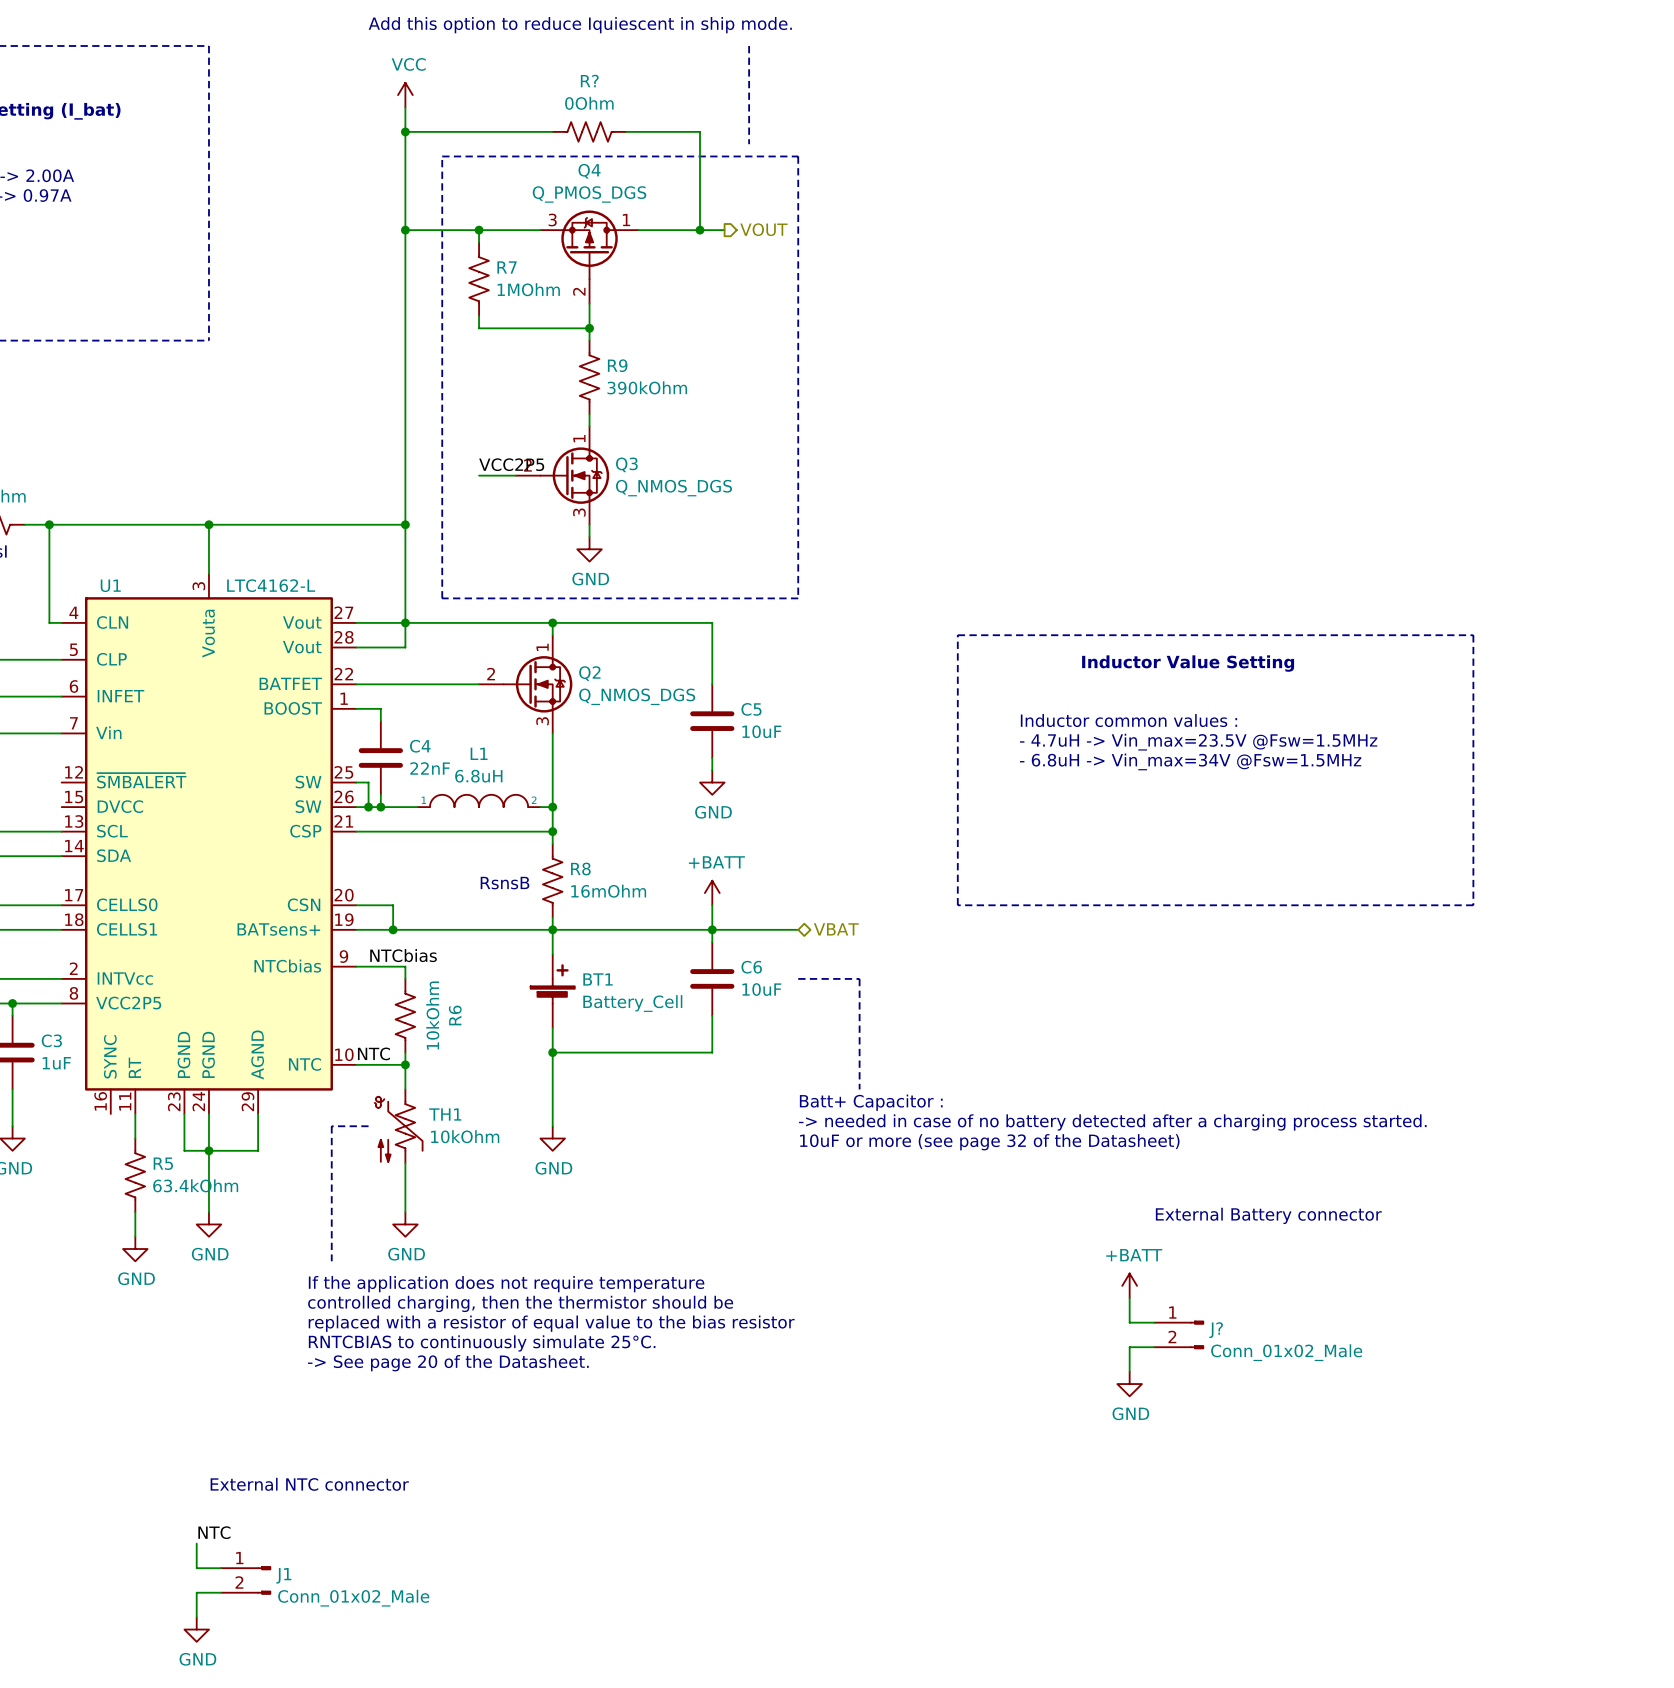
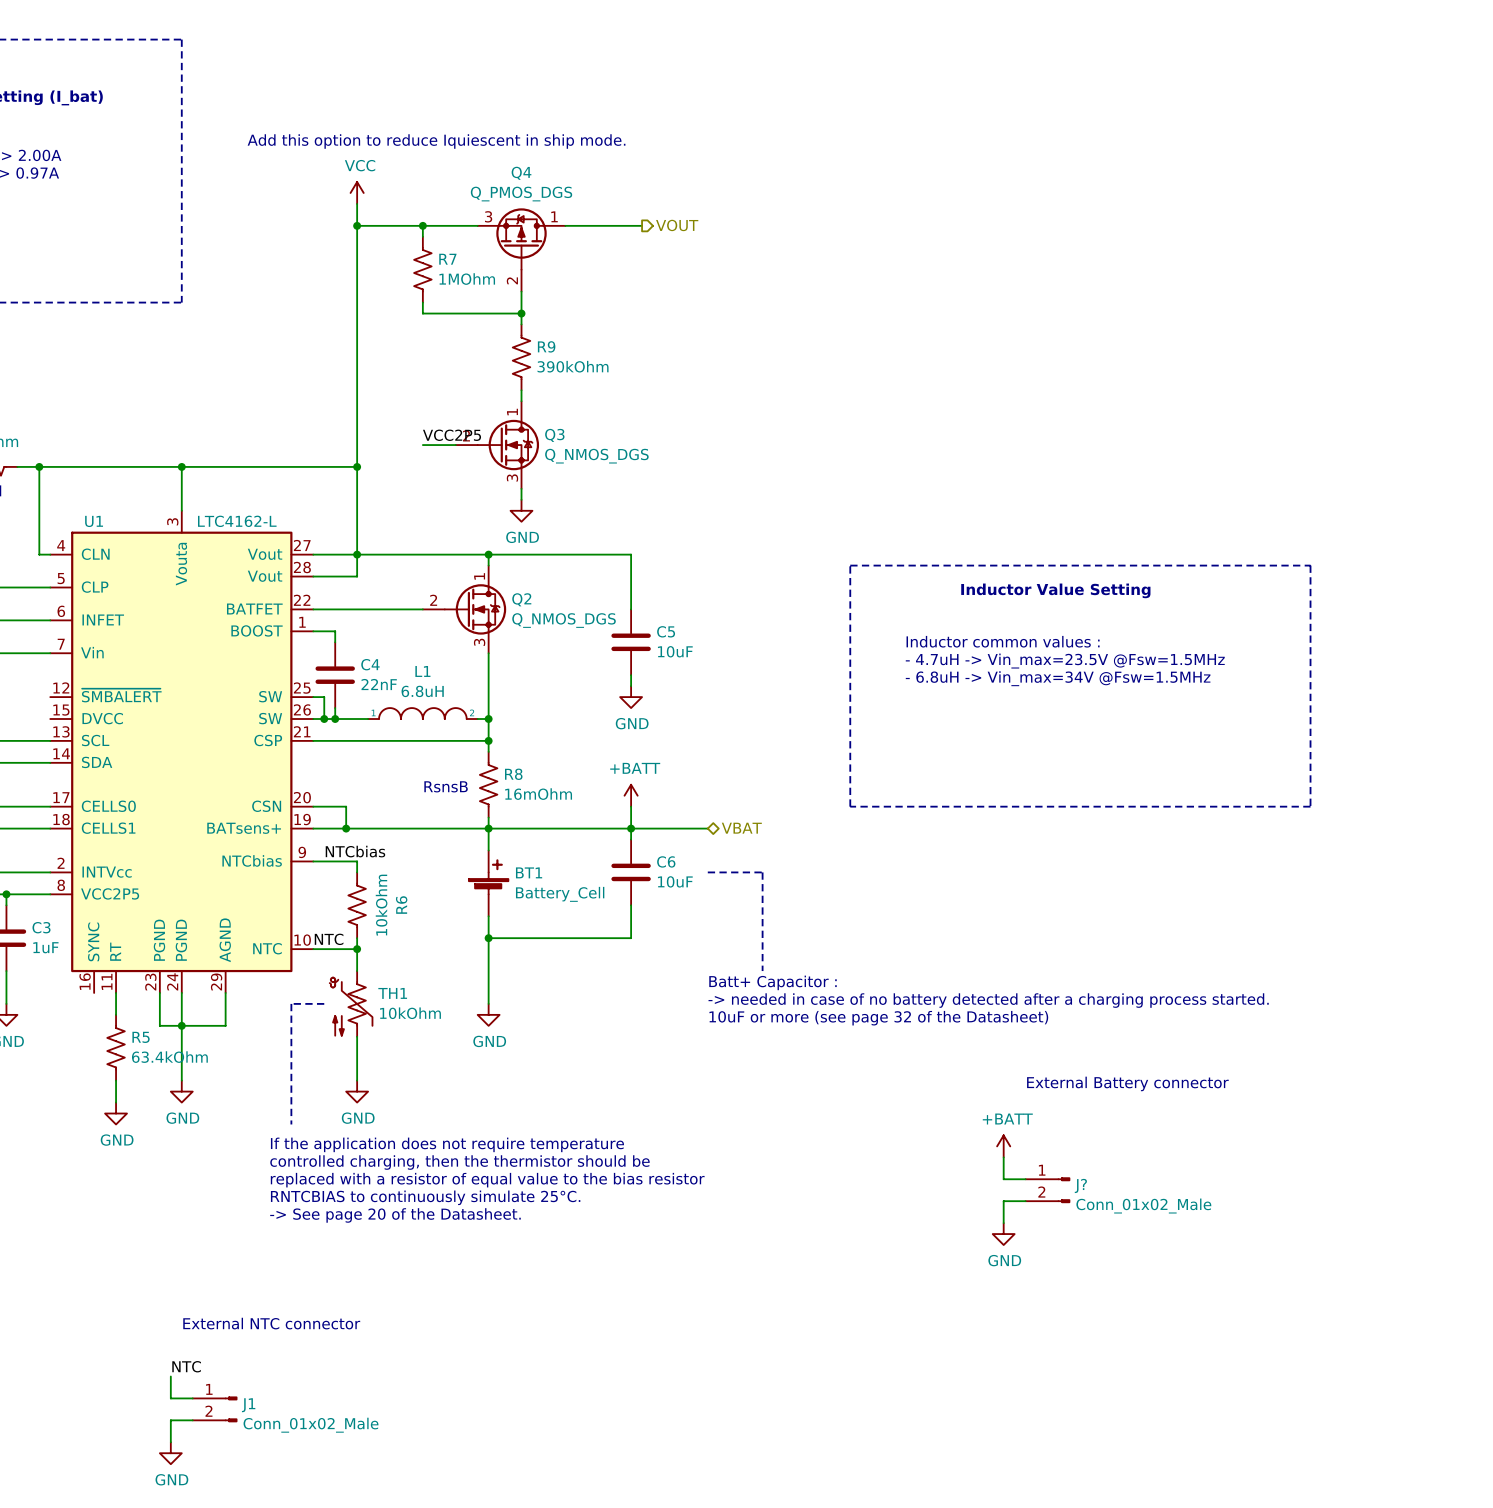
text position: Add this option to reduce Iquiescent in ship mode. (580, 25) -> Add this option to reduce Iquiescent in ship mode. (436, 141)
line: (749, 45) (749, 144) -> none
power symbol position: VCC (405, 95) -> VCC (357, 192)
wire: (405, 107) (405, 230) (540, 230) -> none
wire: (405, 131) (552, 131) -> none
junction: (405, 131) -> none
R?: 0Ohm (589, 131) -> none
wire: (626, 131) (700, 131) (700, 230) -> none
line: (442, 156) (798, 156) (798, 598) (442, 598) (442, 156) -> none
hierarchical label position: VOUT (763, 229) -> VOUT (677, 225)
junction position: (405, 230) -> (357, 225)
wire: (479, 230) (479, 242) -> (422, 225) (422, 236)
junction position: (479, 230) -> (422, 225)
wire: (638, 230) (724, 230) -> (565, 225) (642, 225)
junction: (700, 230) -> none
wire: none -> (357, 225) (477, 225)
Q4 position: (589, 257) -> (521, 249)
R7 position: (479, 279) -> (422, 269)
wire: (589, 303) (589, 328) (479, 328) (479, 316) -> none
junction position: (589, 328) -> (521, 313)
wire: none -> (422, 302) (422, 313) (521, 313)
R9 position: (589, 377) -> (521, 357)
label position: VCC2P5 (511, 464) -> VCC2P5 (452, 435)
wire: (479, 475) (515, 475) -> (422, 445) (455, 445)
Q3 position: (562, 475) -> (497, 445)
power symbol position: GND (589, 549) -> GND (521, 510)

